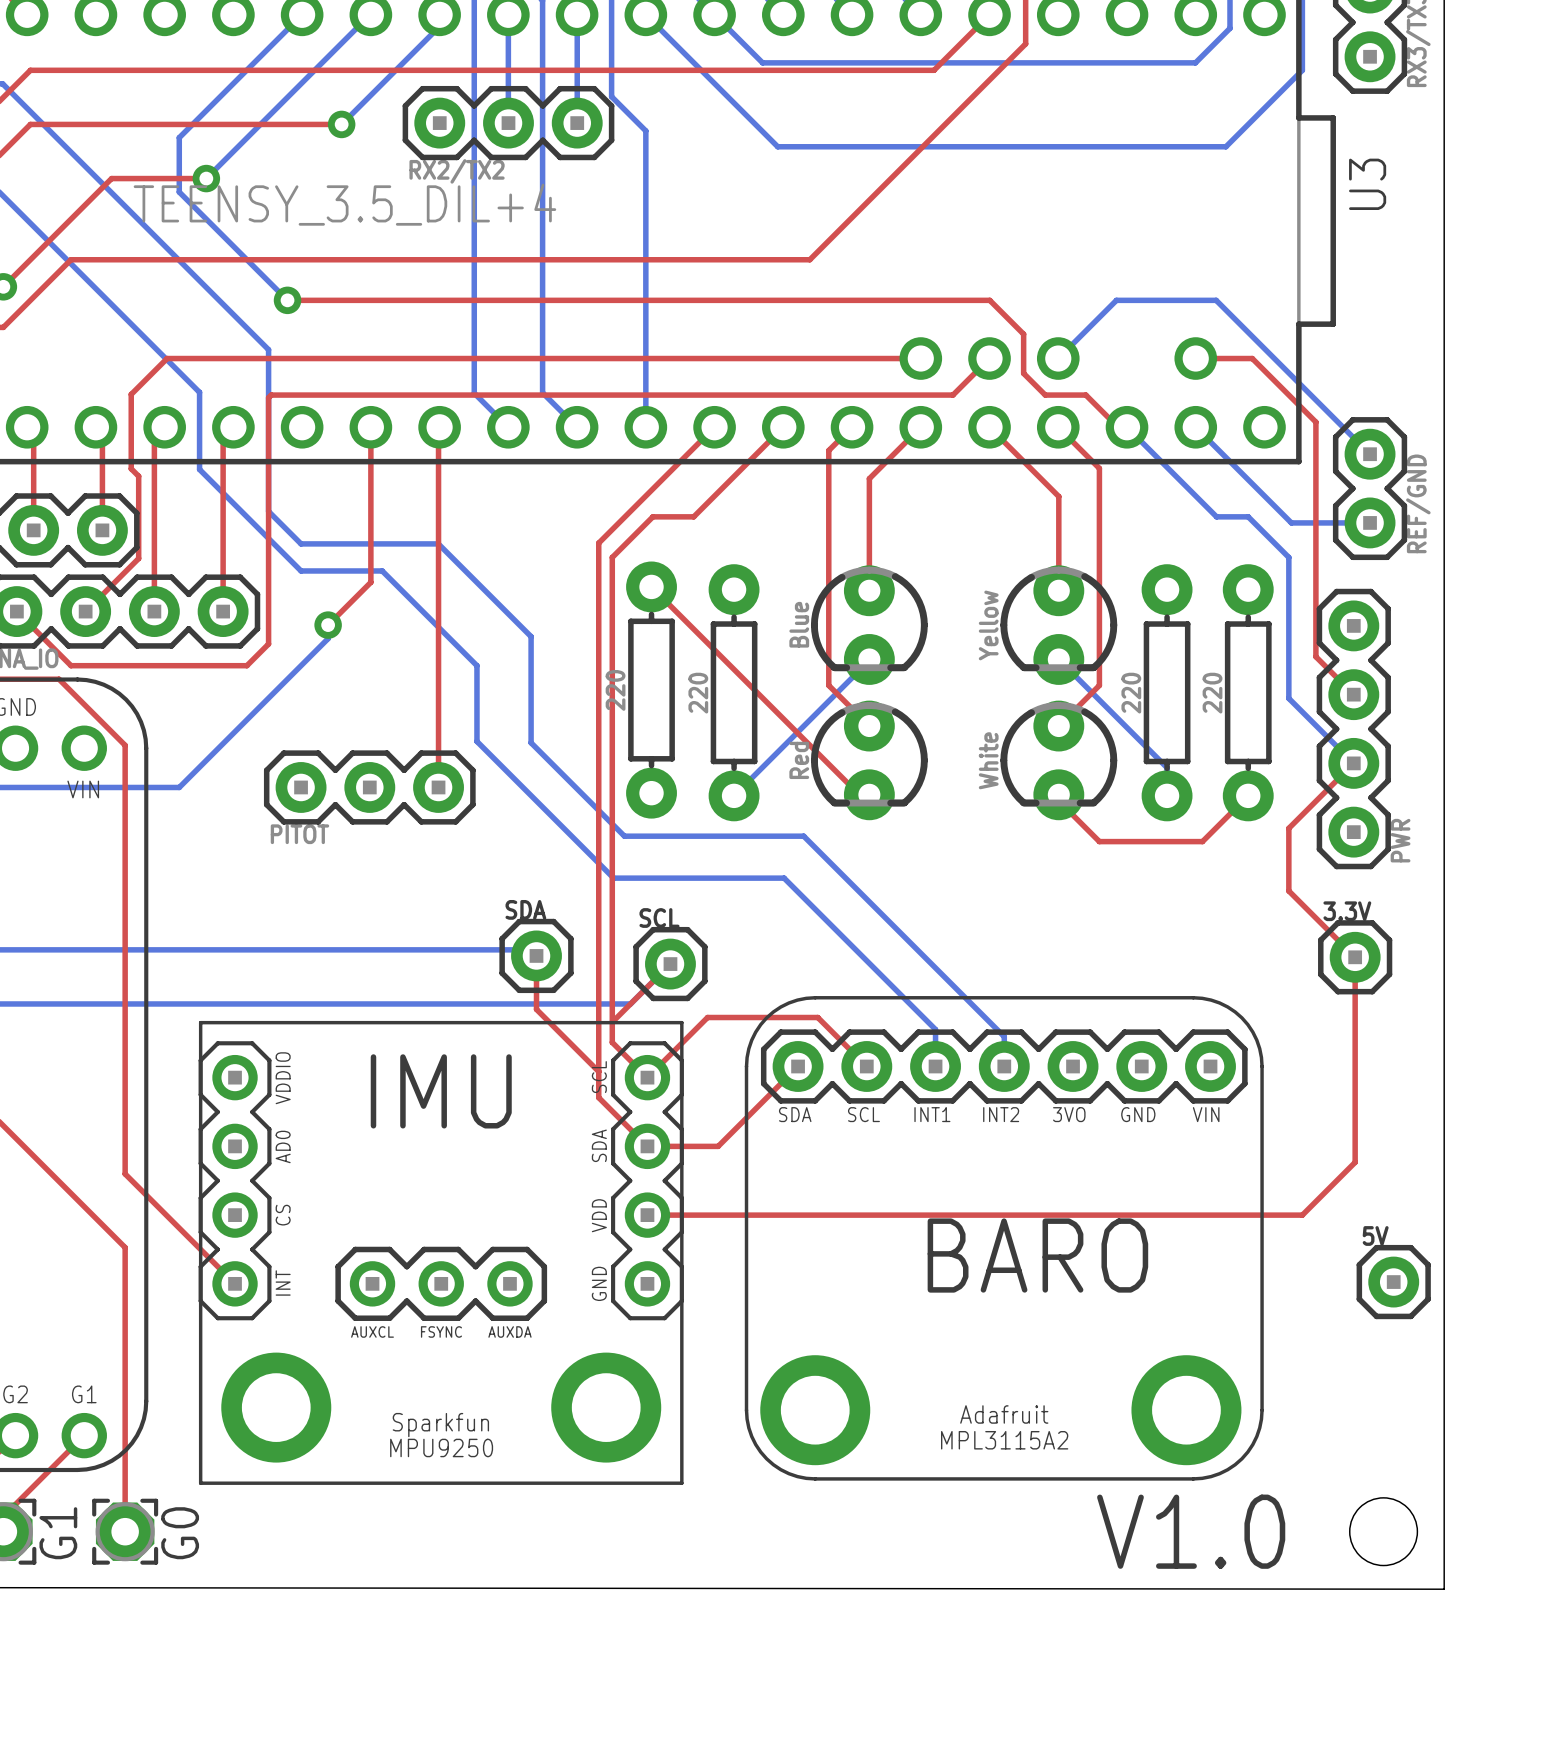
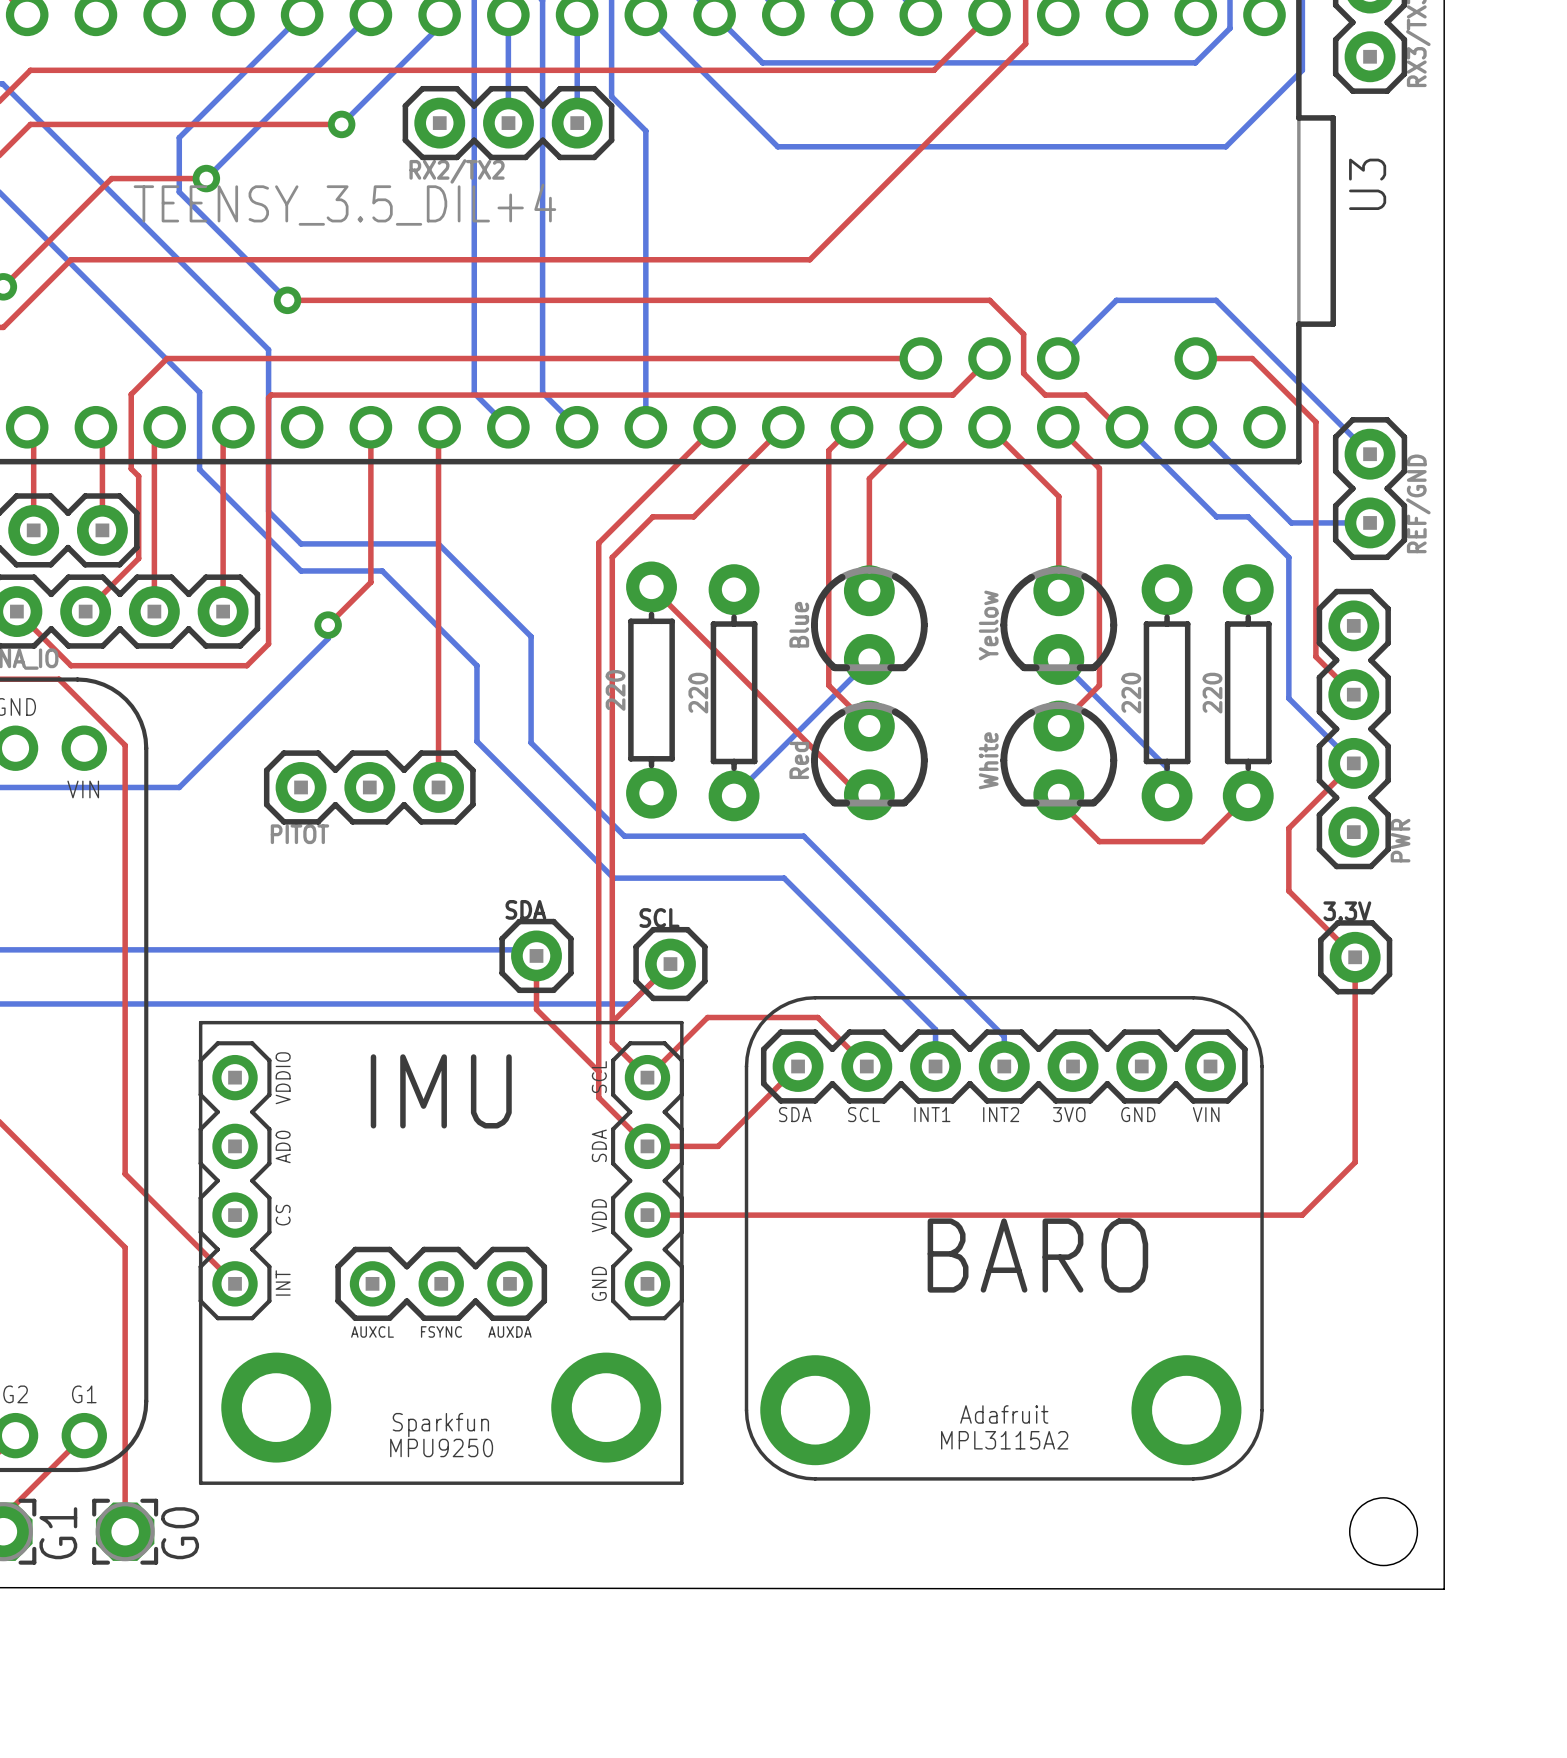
5V: (1393, 1282) -> none
text: V1.0 (1191, 1531) -> none

